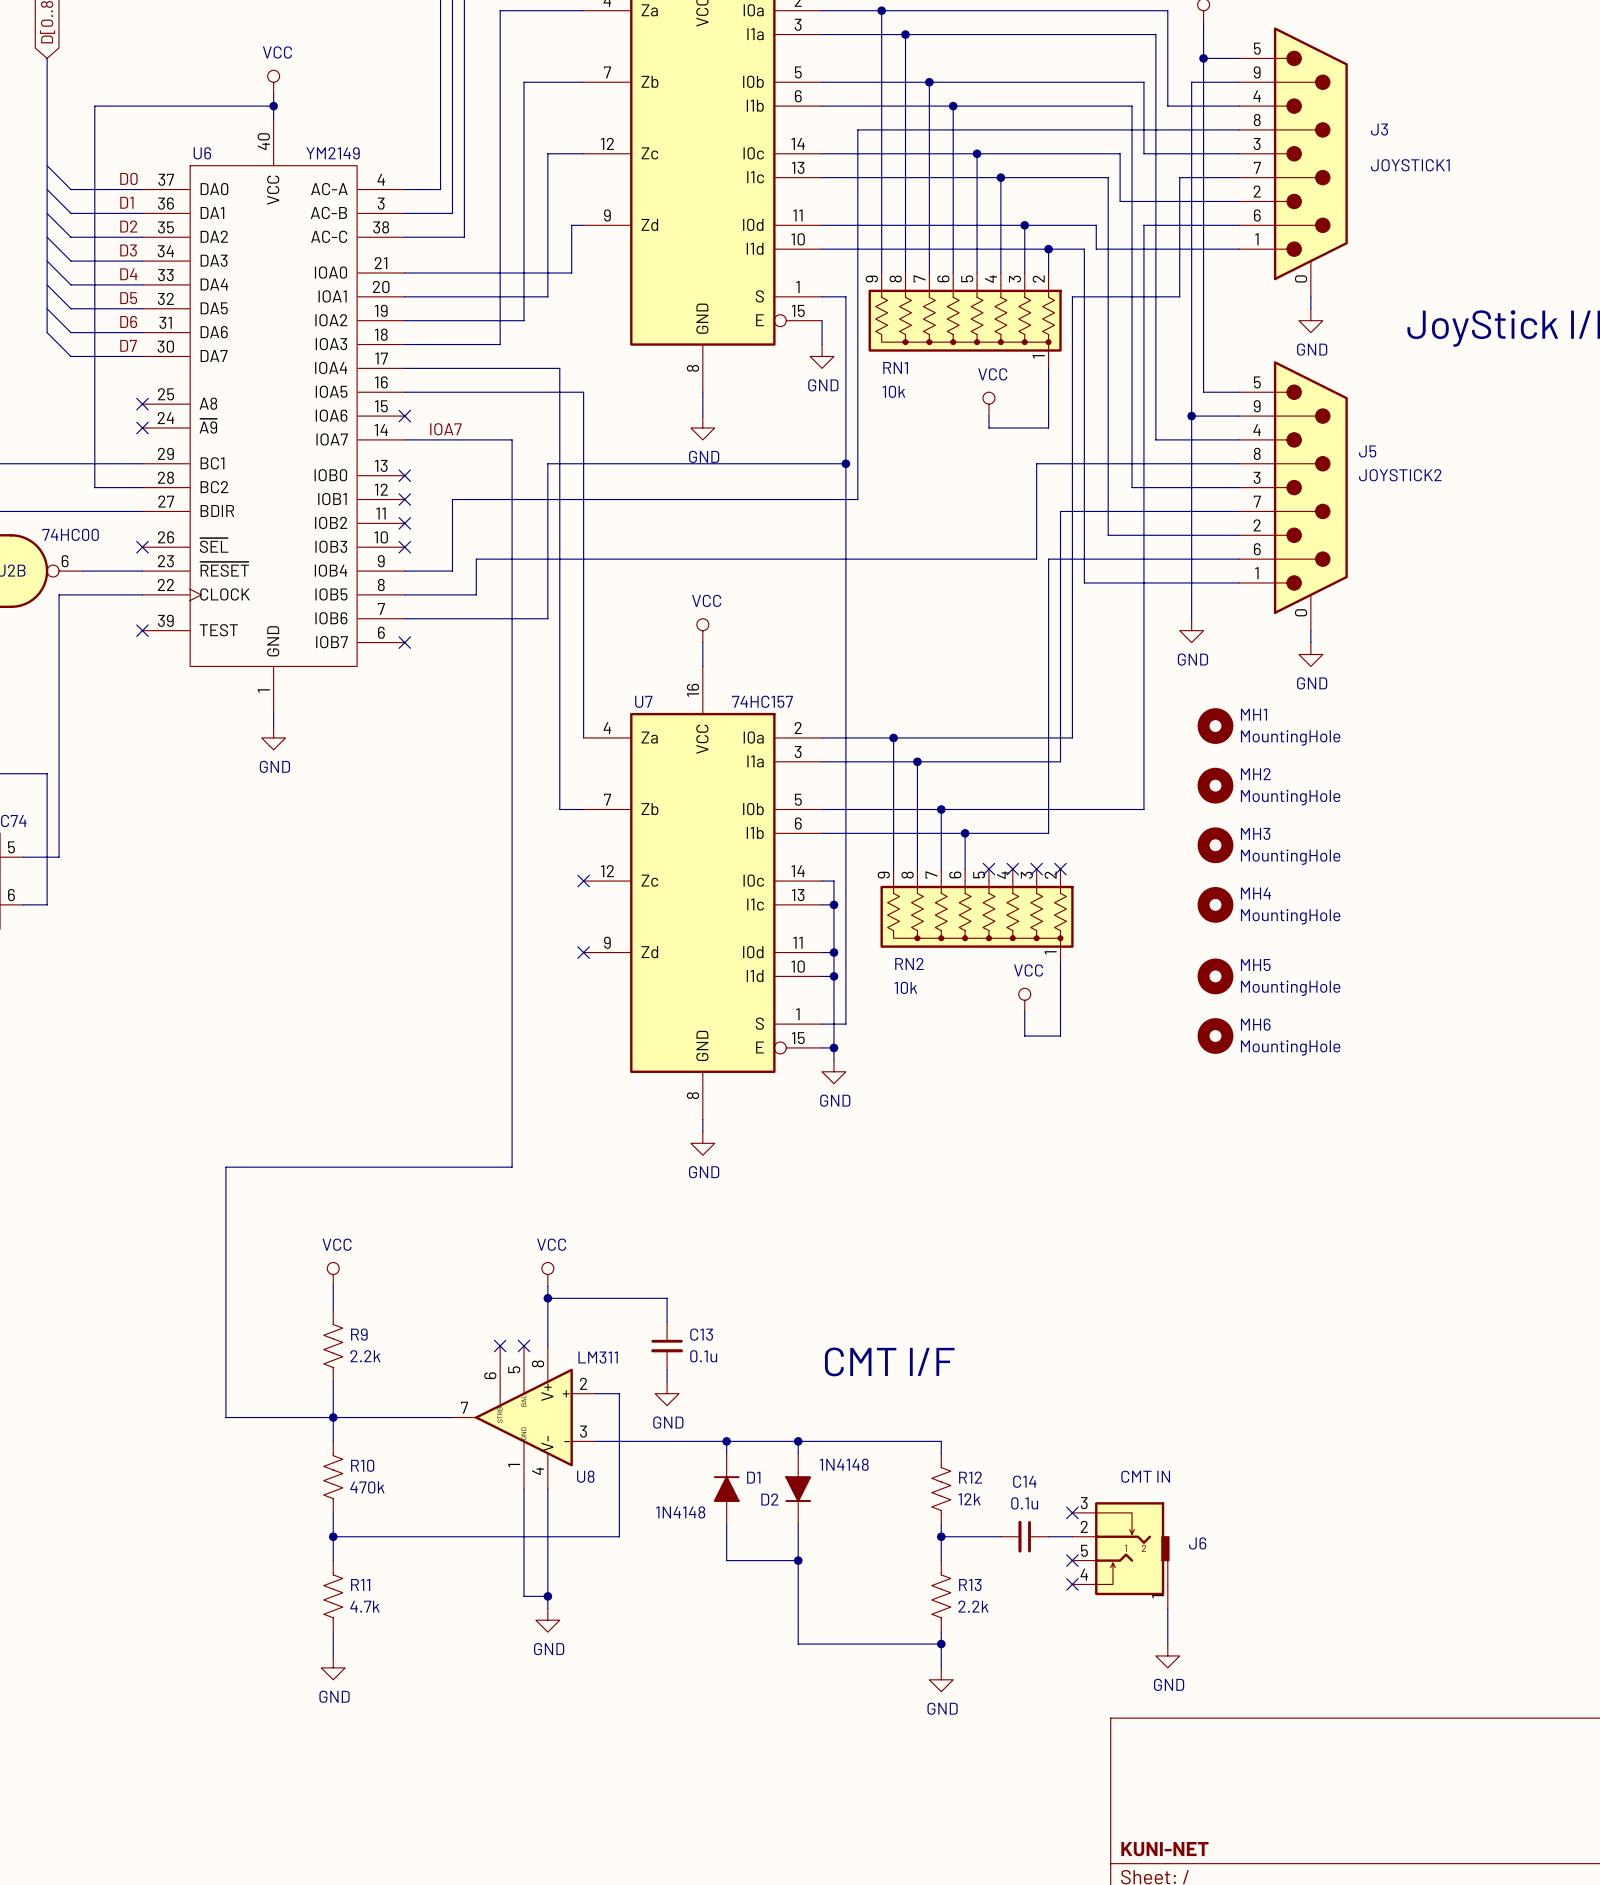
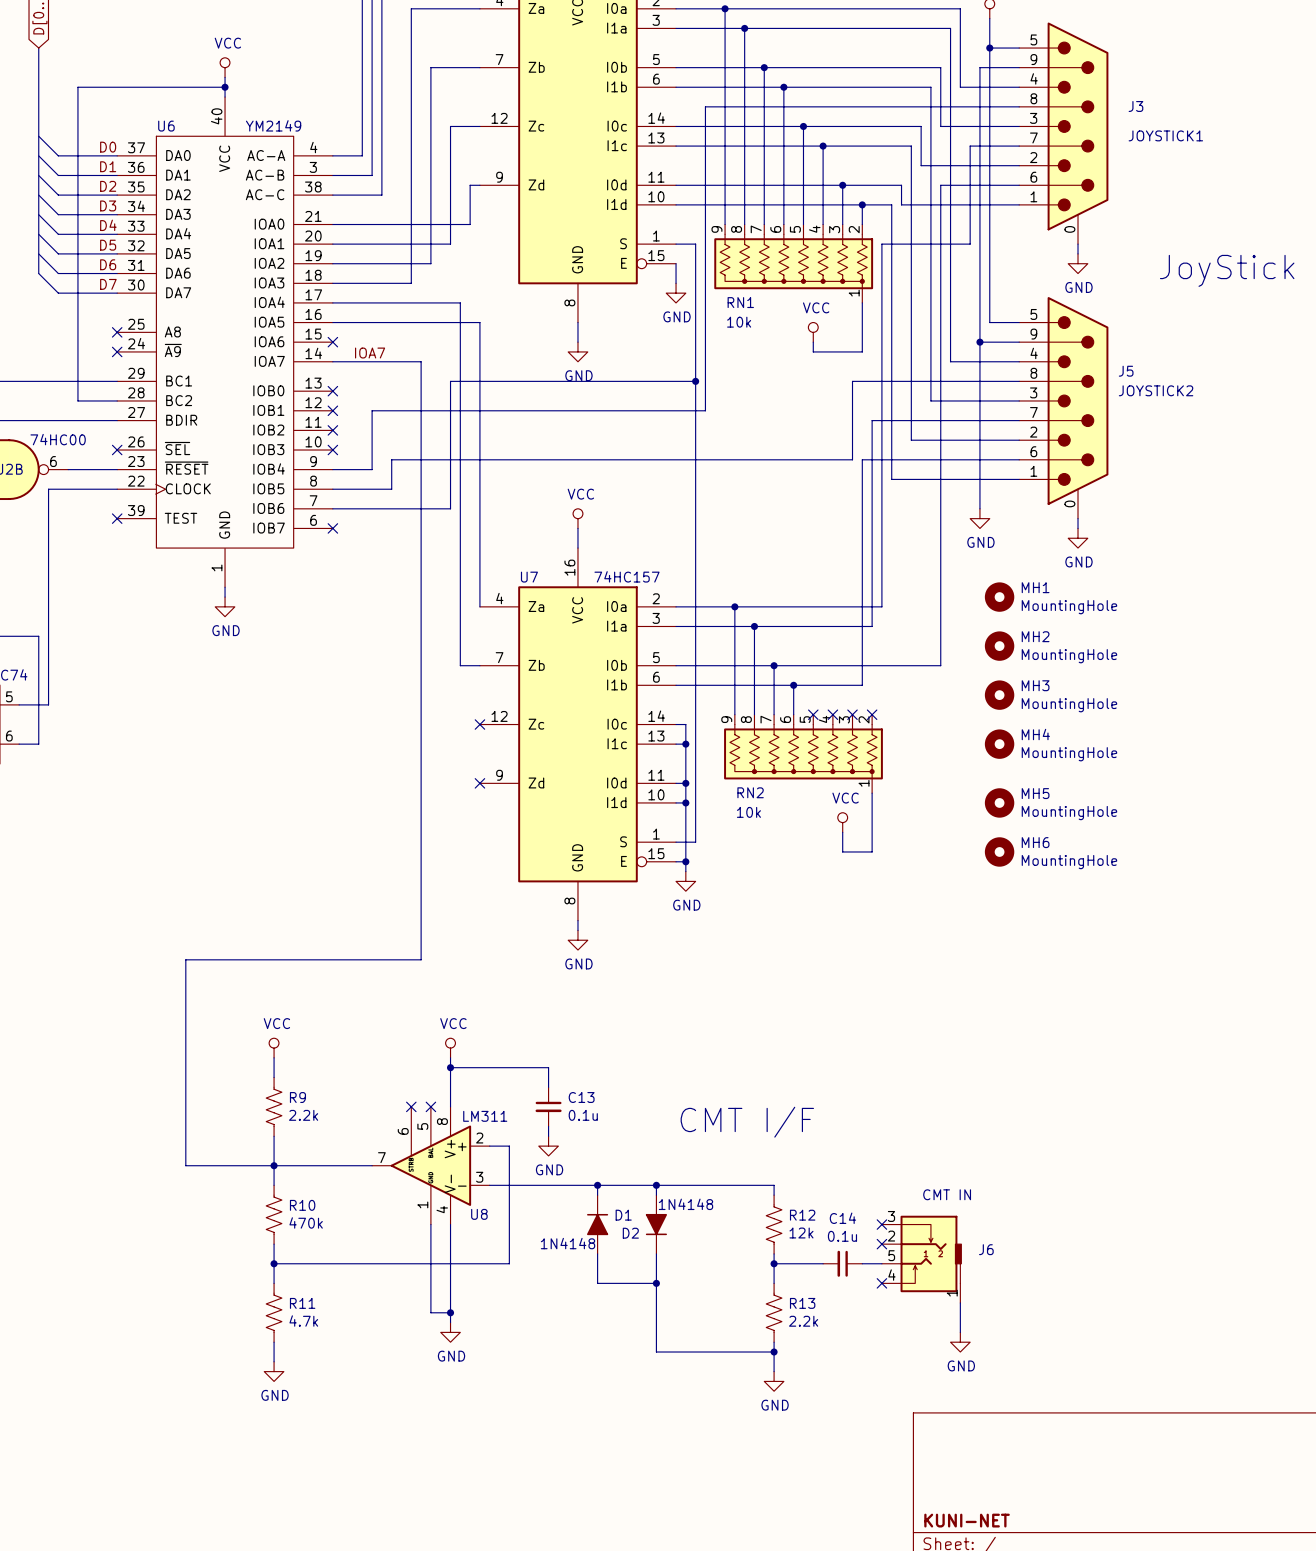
no-connect mark: none -> (881, 1224)
J6 position: (1120, 1555) -> (921, 1259)
no-connect mark: (1072, 1584) -> none
power symbol position: GND (1167, 1655) -> GND (960, 1342)

